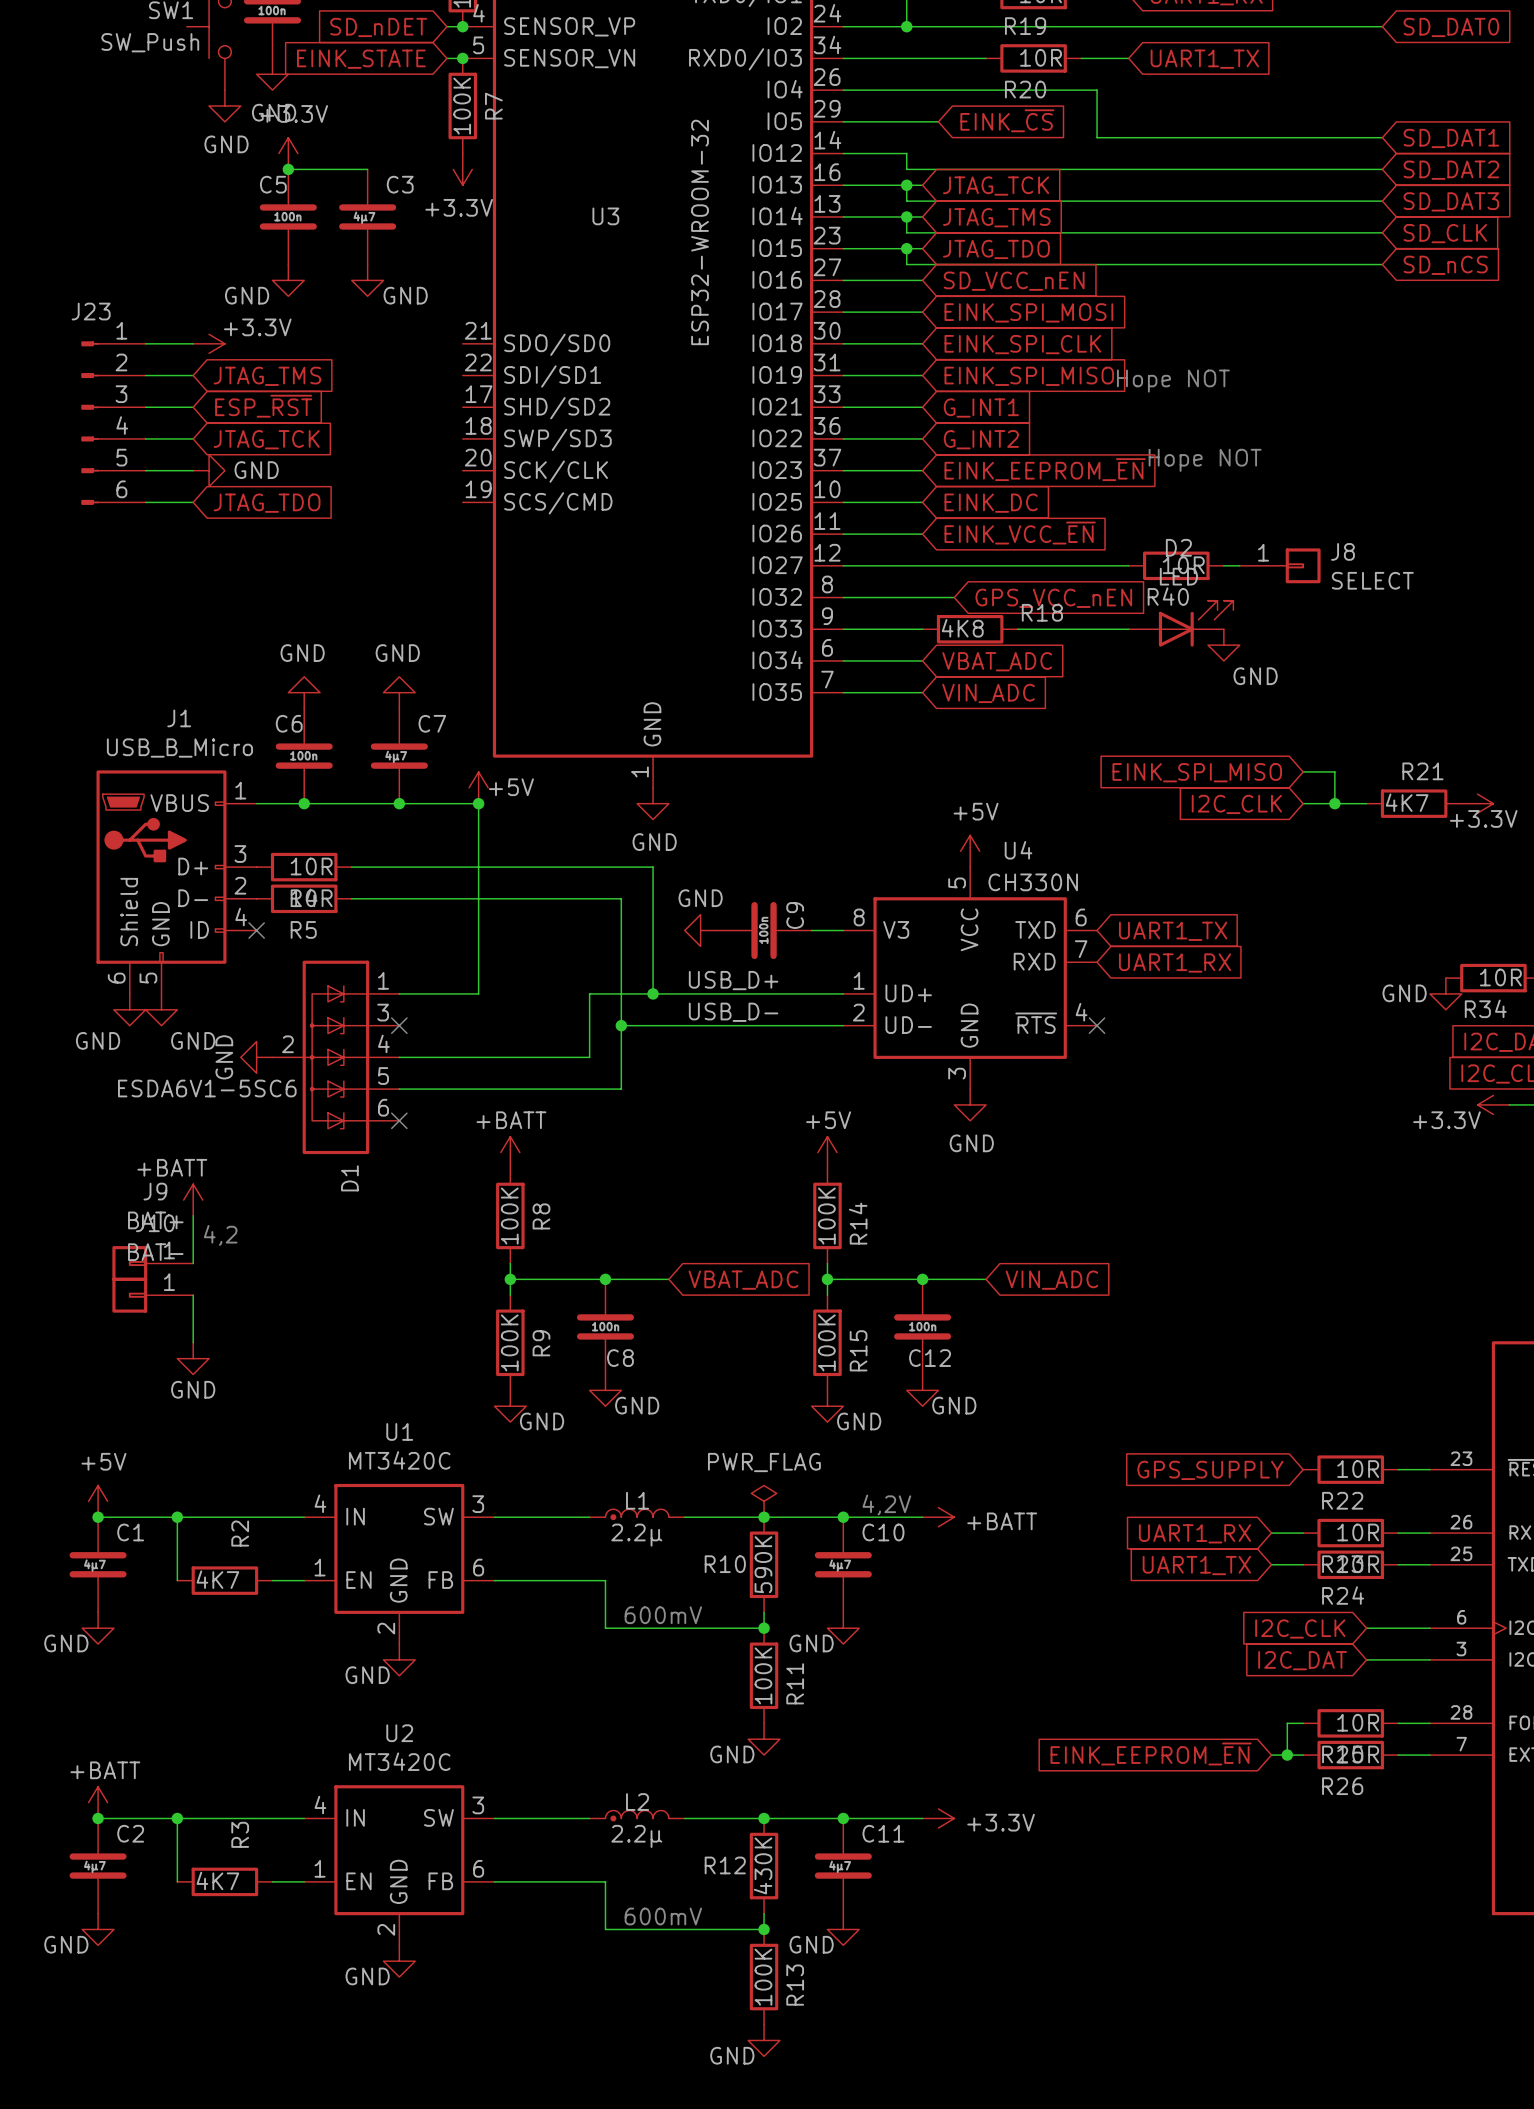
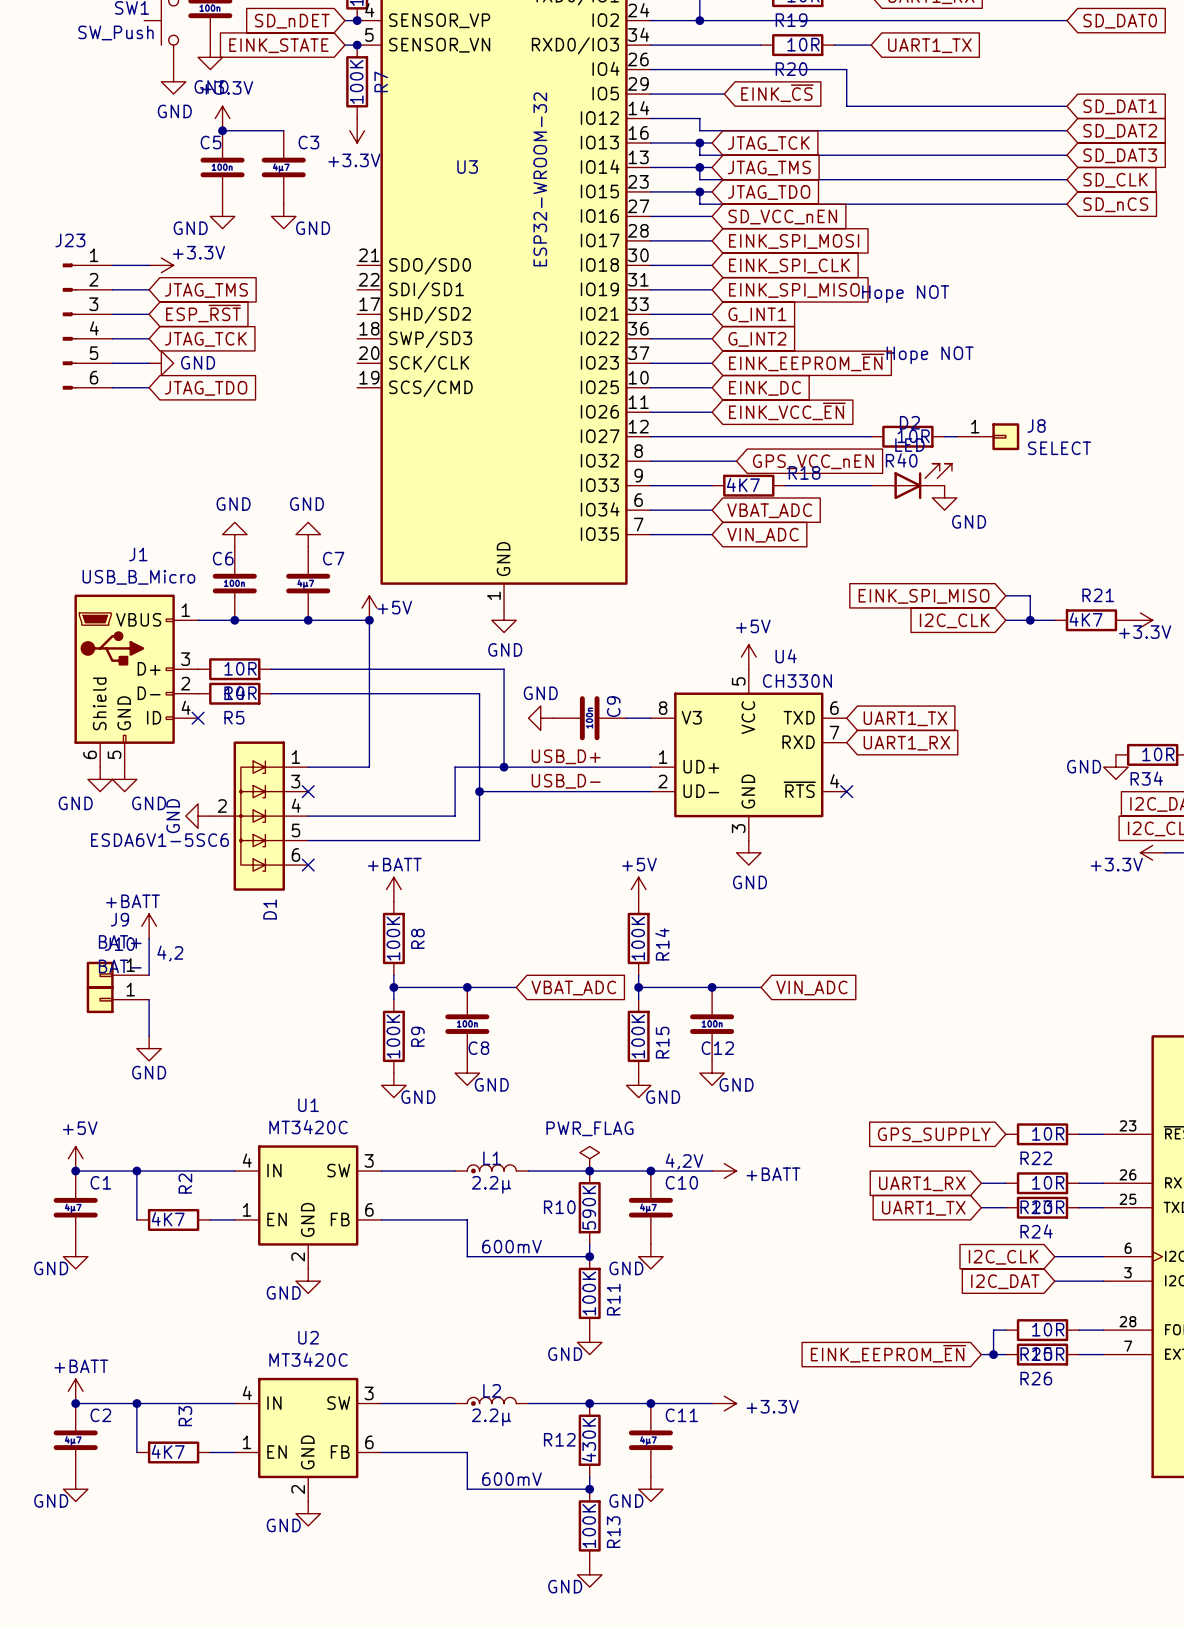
R18 value: 4K8 (962, 628) -> 4K7 (743, 484)

